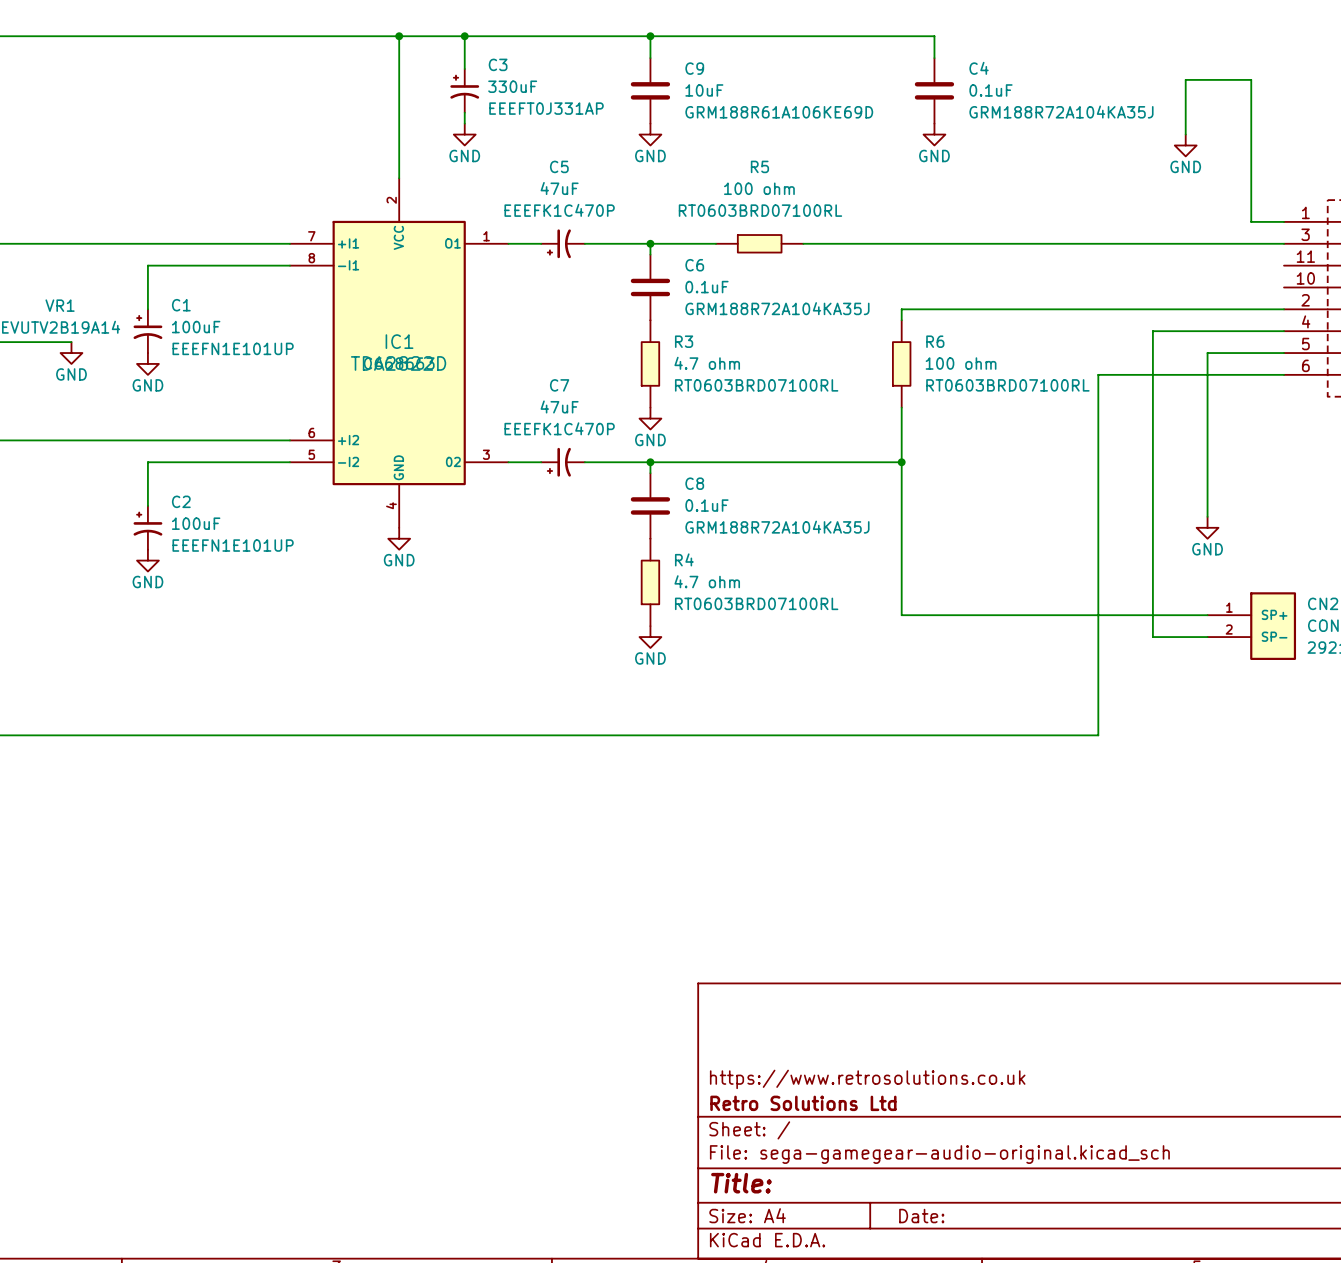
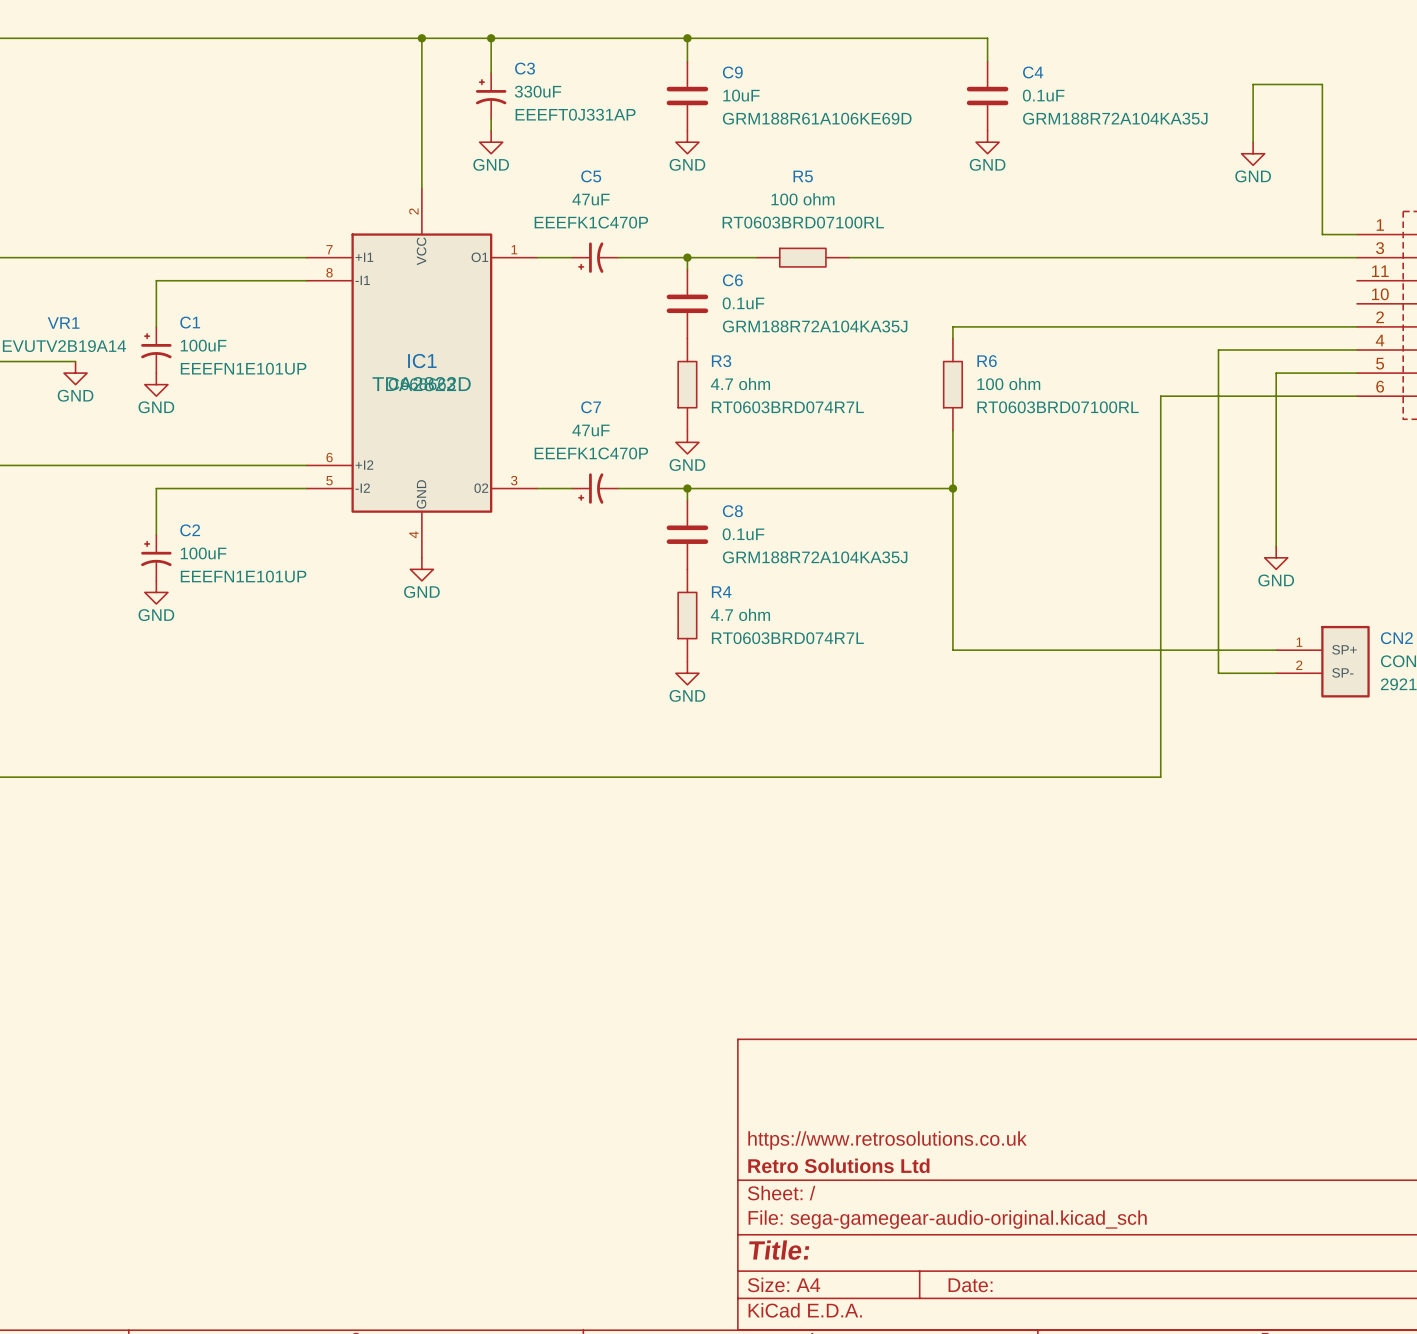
R3 text: RT0603BRD07100RL (756, 385) -> RT0603BRD074R7L (787, 407)
R4 text: RT0603BRD07100RL (756, 603) -> RT0603BRD074R7L (787, 638)

